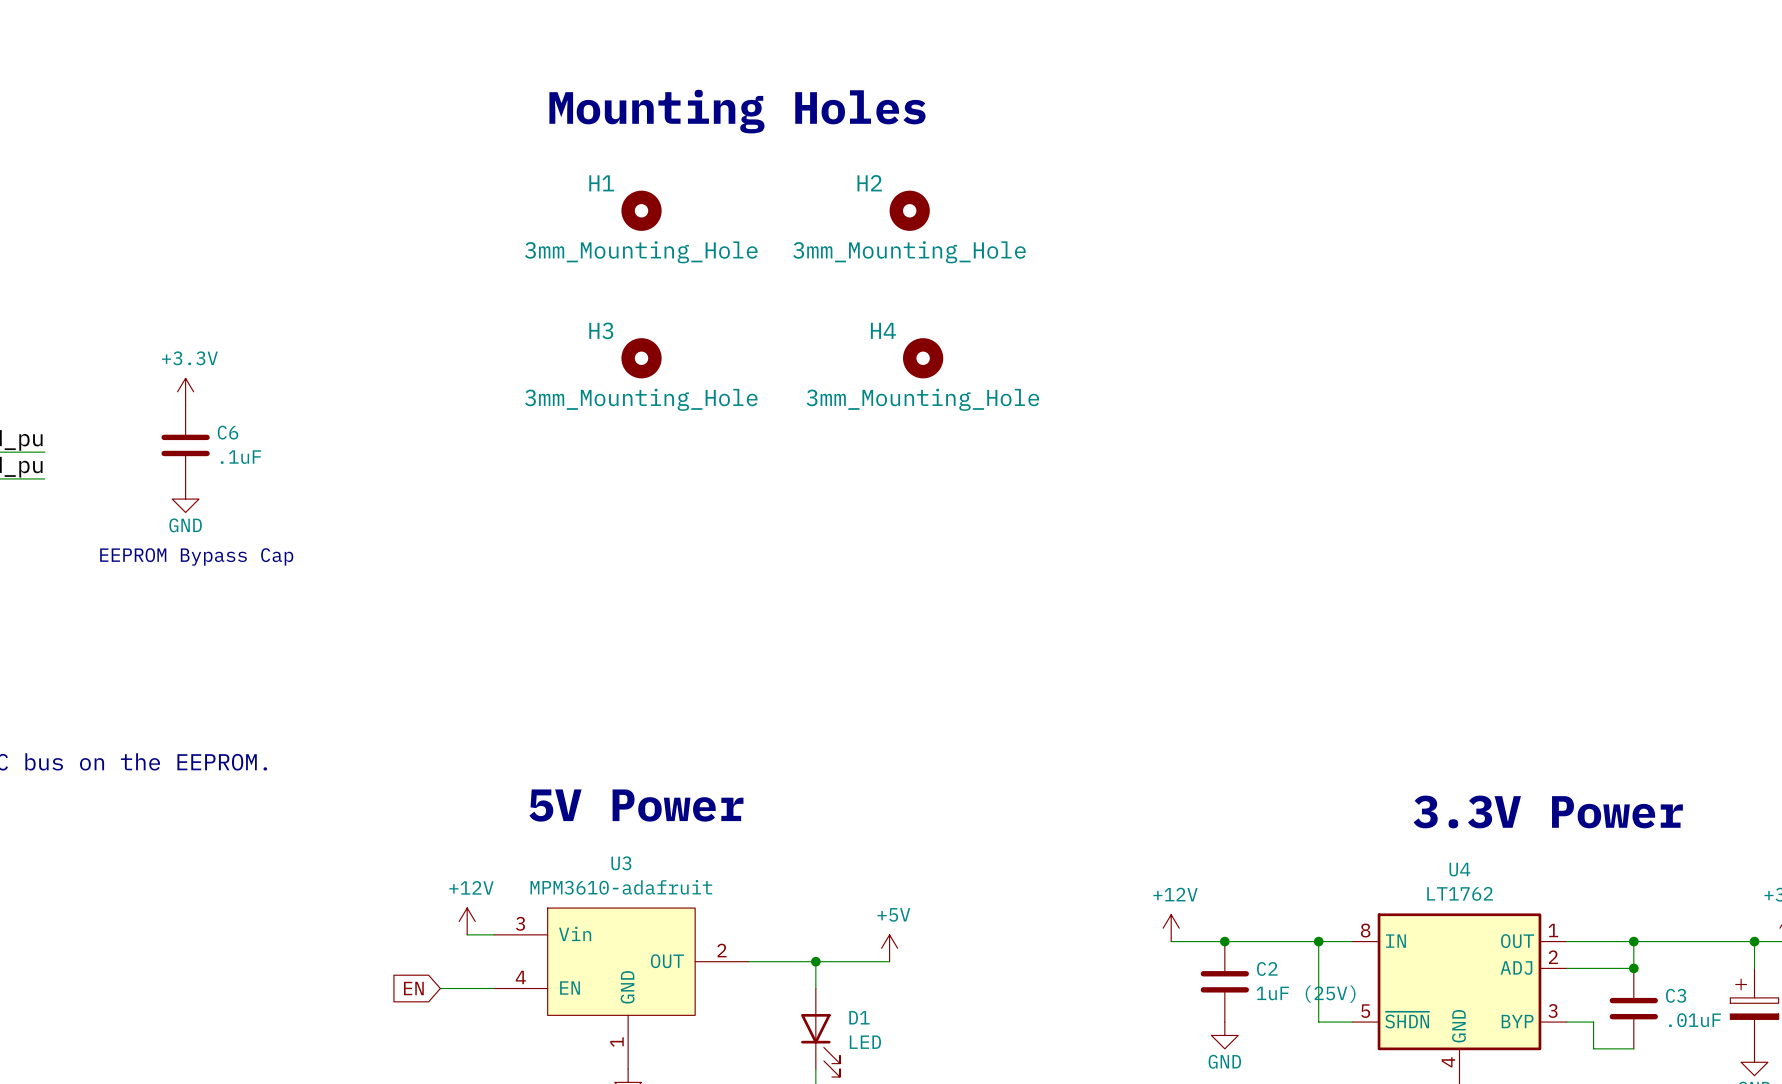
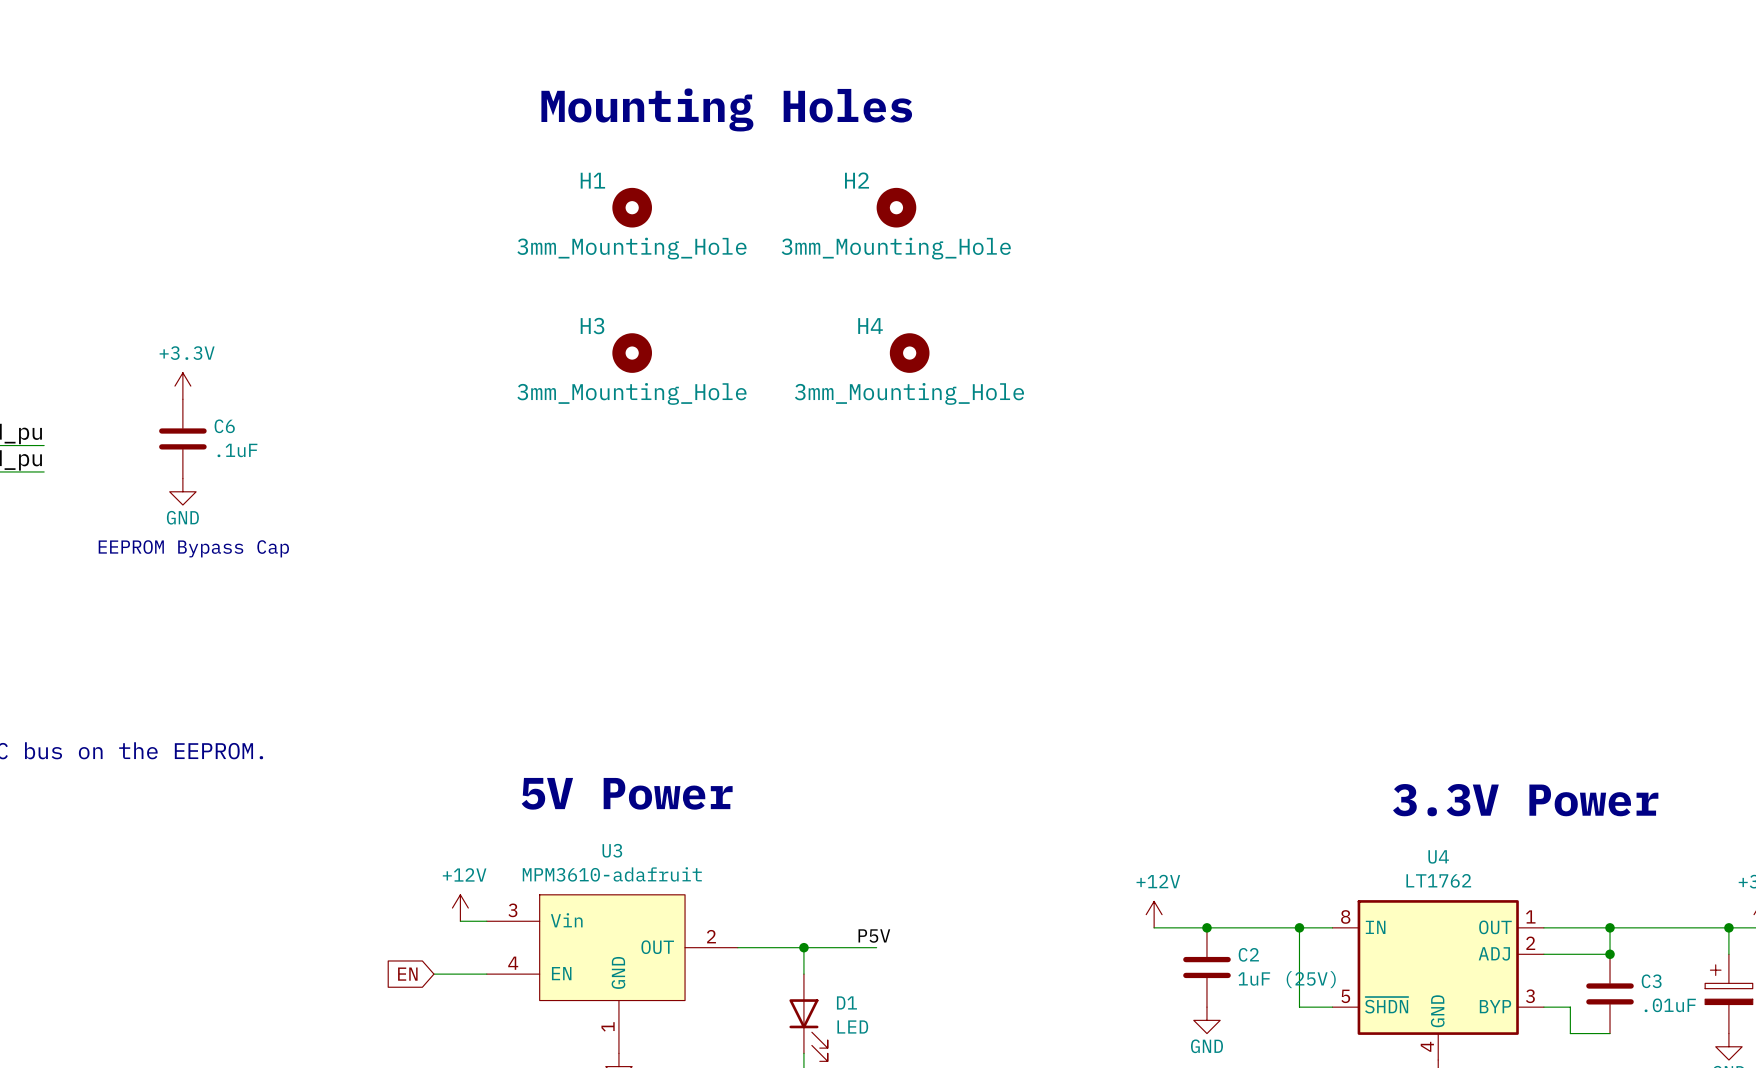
power symbol: +5V (889, 948) -> none
label: none -> P5V (874, 936)

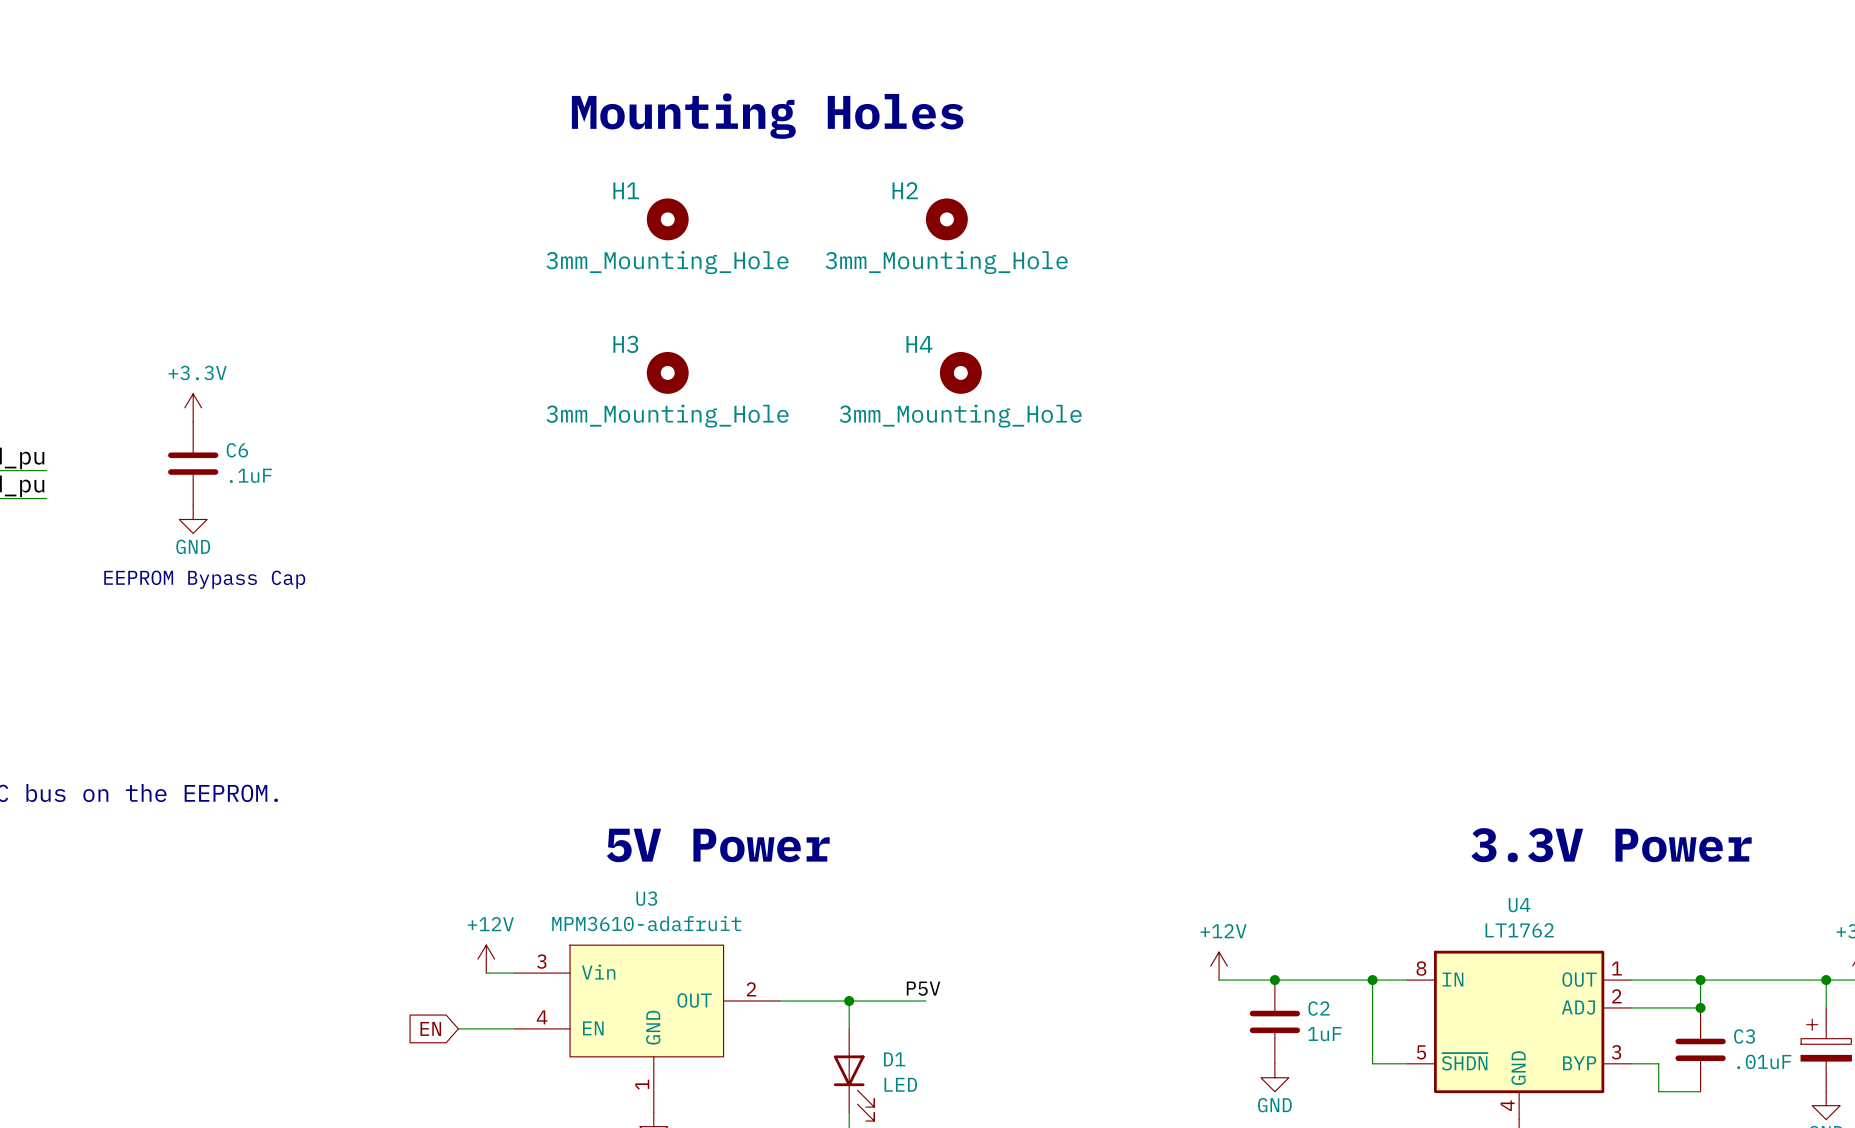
text position: 5V Power (627, 793) -> 5V Power (718, 845)
C2 value: 1uF (25V) (1287, 979) -> 1uF (1324, 1034)

